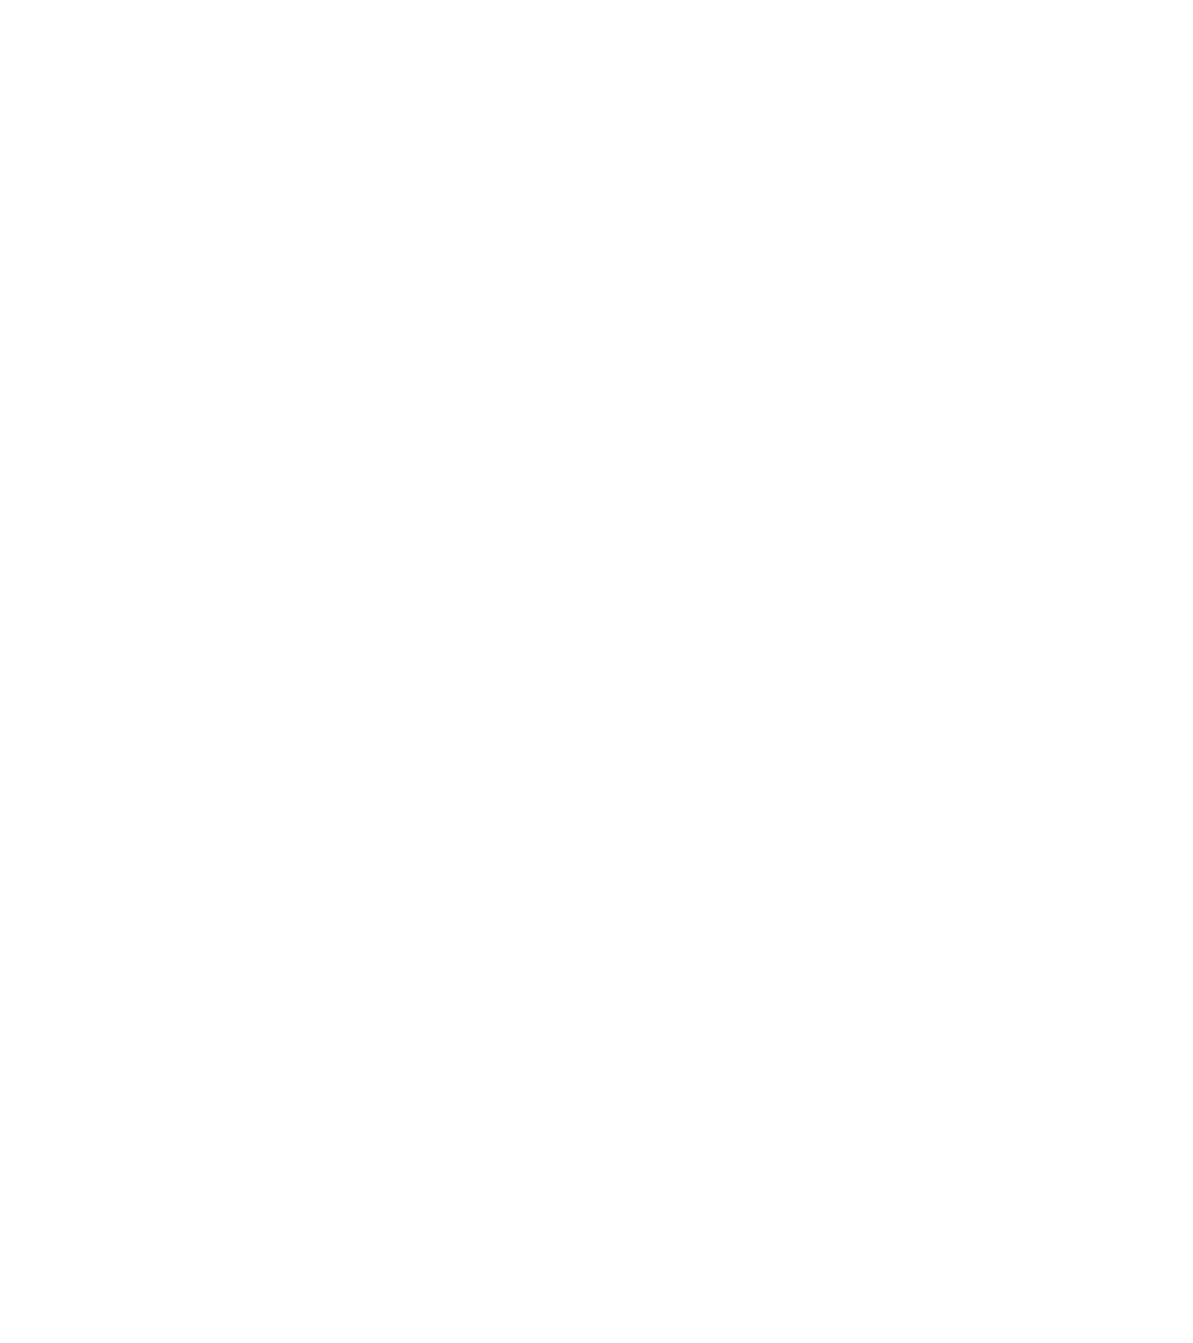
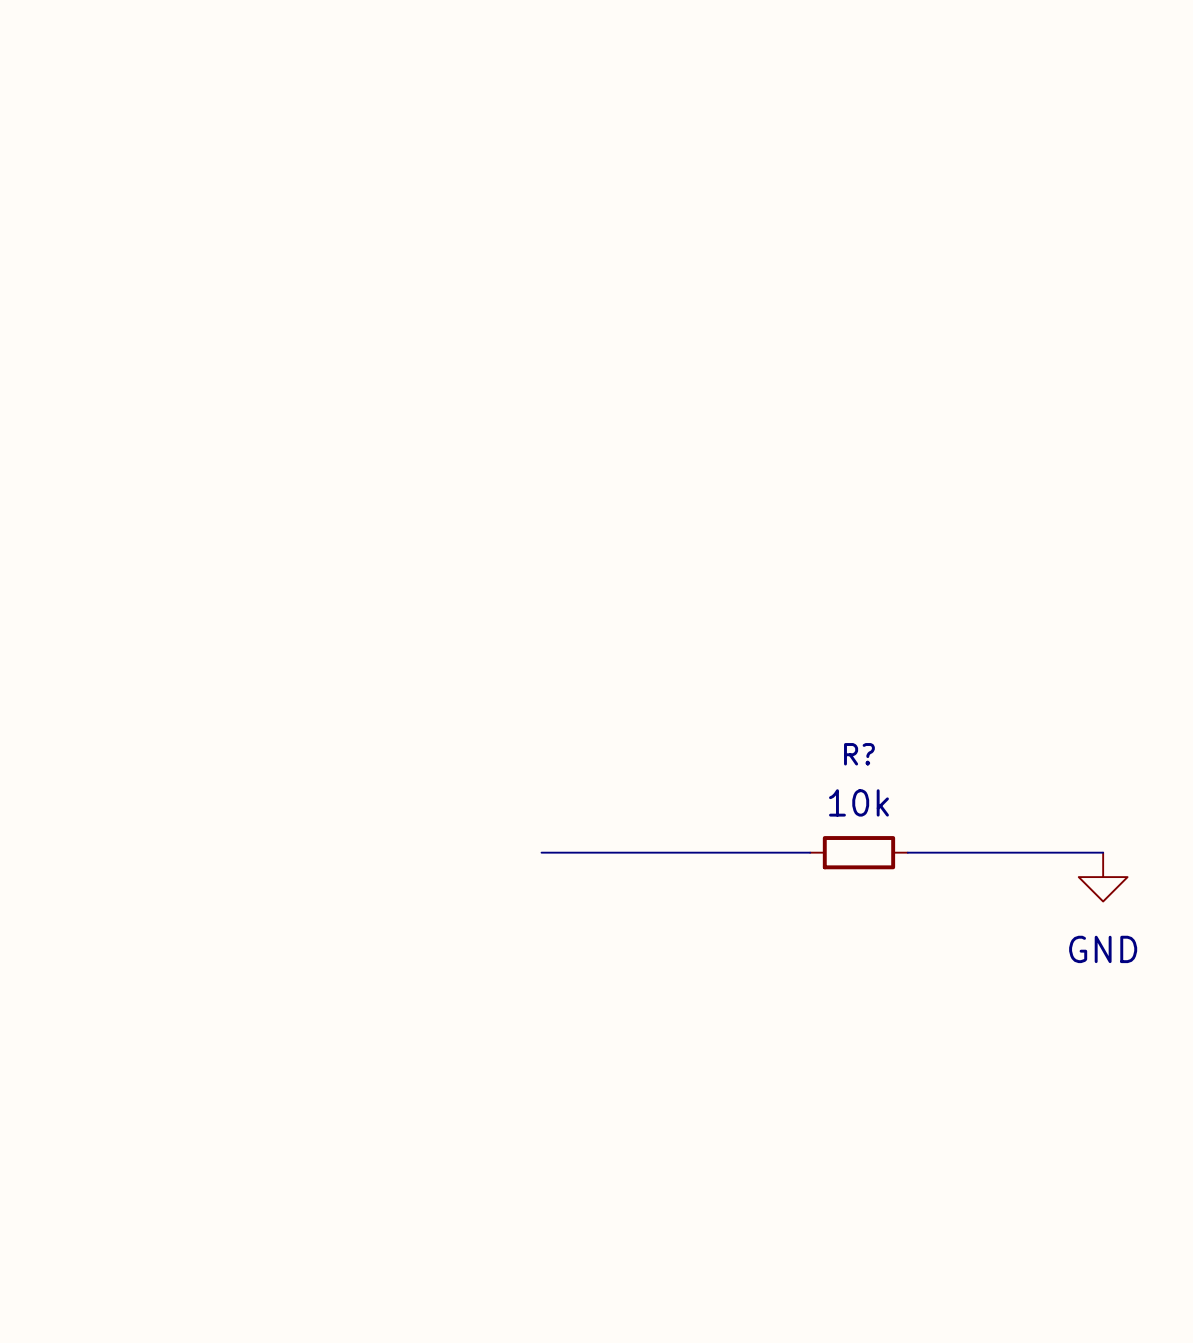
wire: none -> (541, 852) (810, 852)
R?: none -> 10k (858, 852)
wire: none -> (907, 852) (1103, 852)
power symbol: none -> GND (1103, 877)

